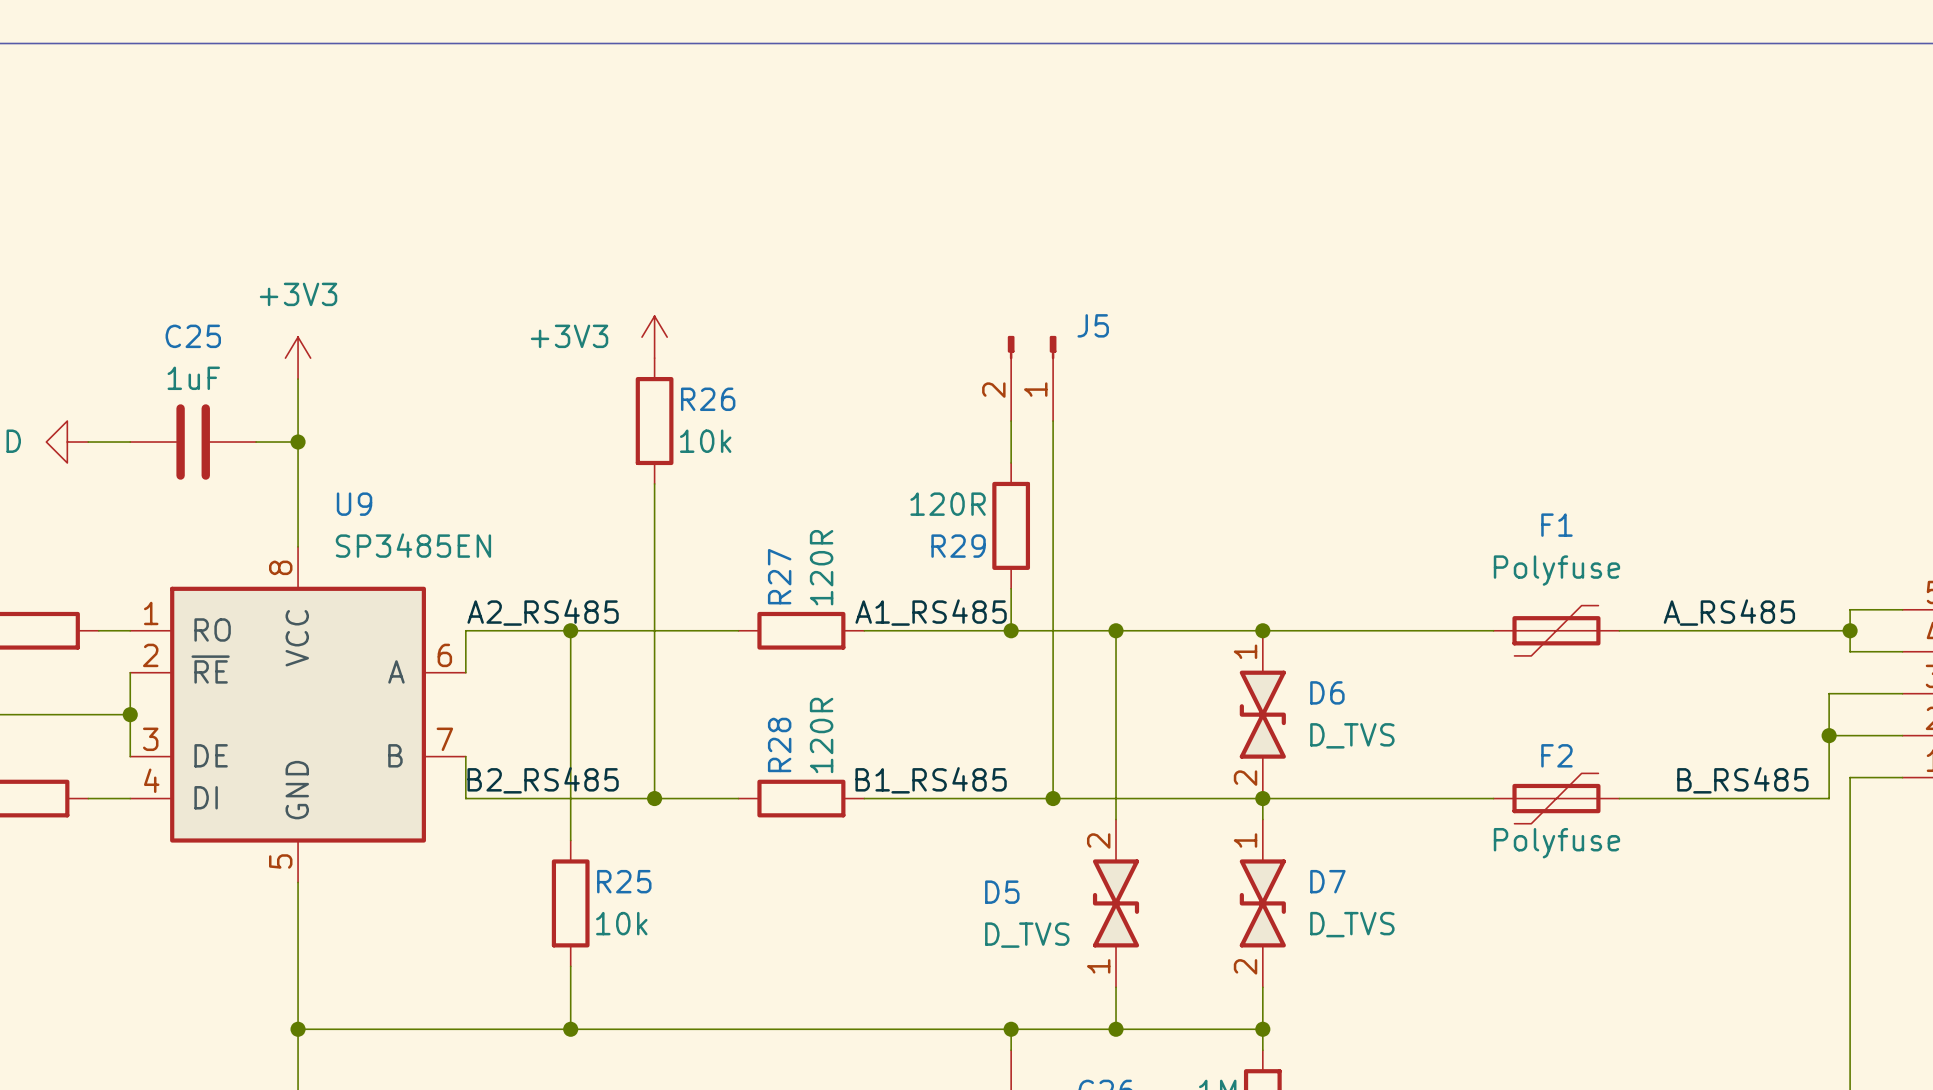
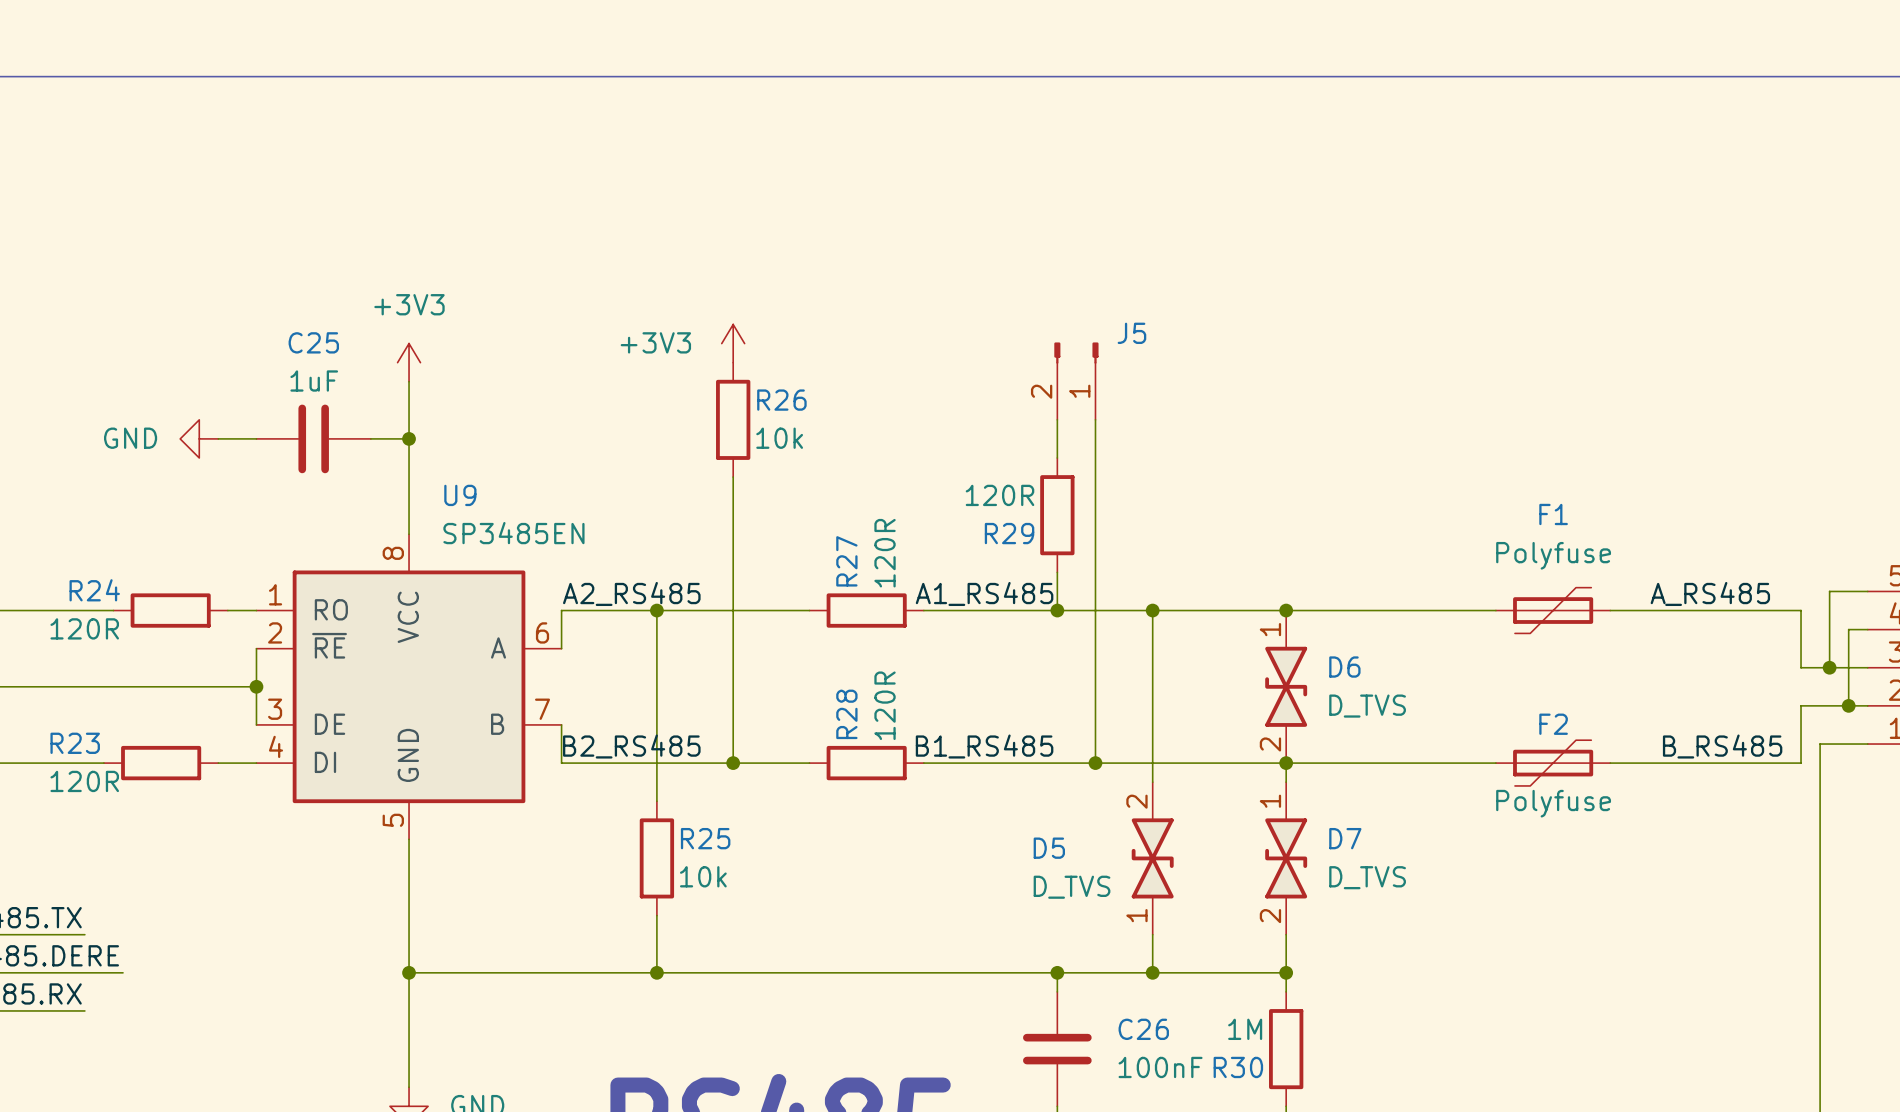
wire: (1860, 609) (1850, 609) (1850, 651) (1881, 651) -> (1829, 591) (1829, 667)
wire: (1829, 630) (1850, 630) -> (1801, 610) (1801, 667)
junction: (1850, 630) -> none
wire: none -> (1848, 629) (1848, 705)
wire: (1829, 693) (1829, 735) -> none
junction: none -> (1829, 667)
junction: (1829, 735) -> none
junction: none -> (1848, 705)

